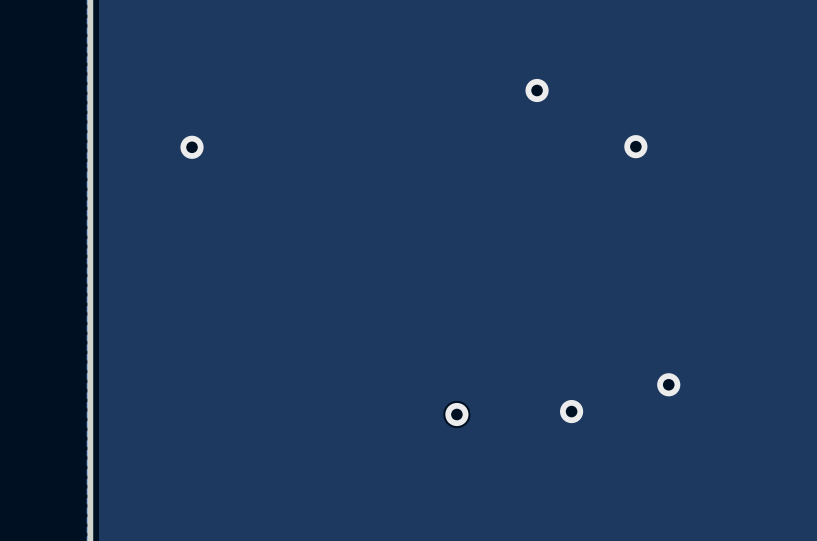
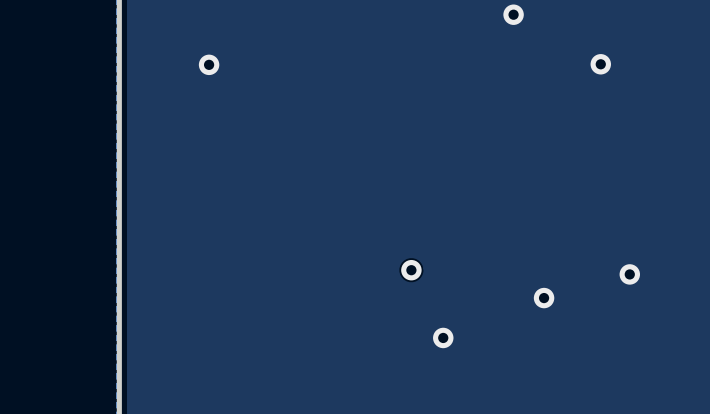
via: none -> (411, 270)
via: (456, 414) -> none
via: none -> (443, 337)

